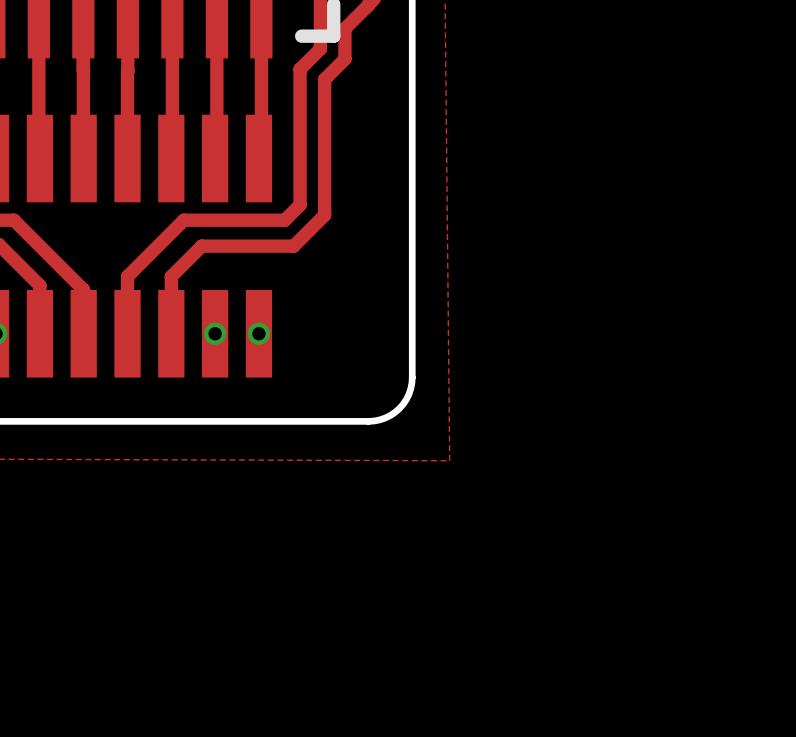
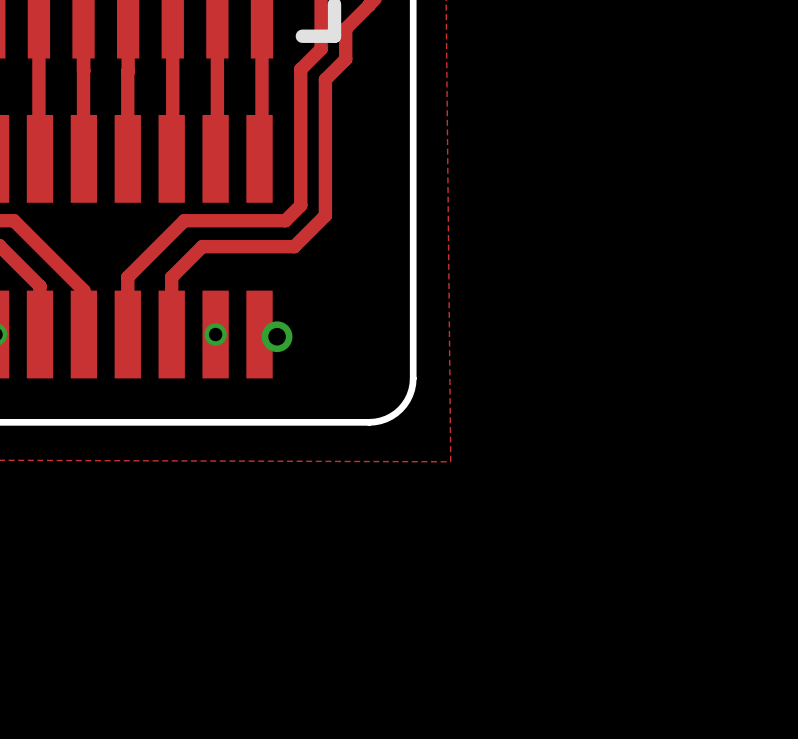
via position: (258, 333) -> (277, 336)

